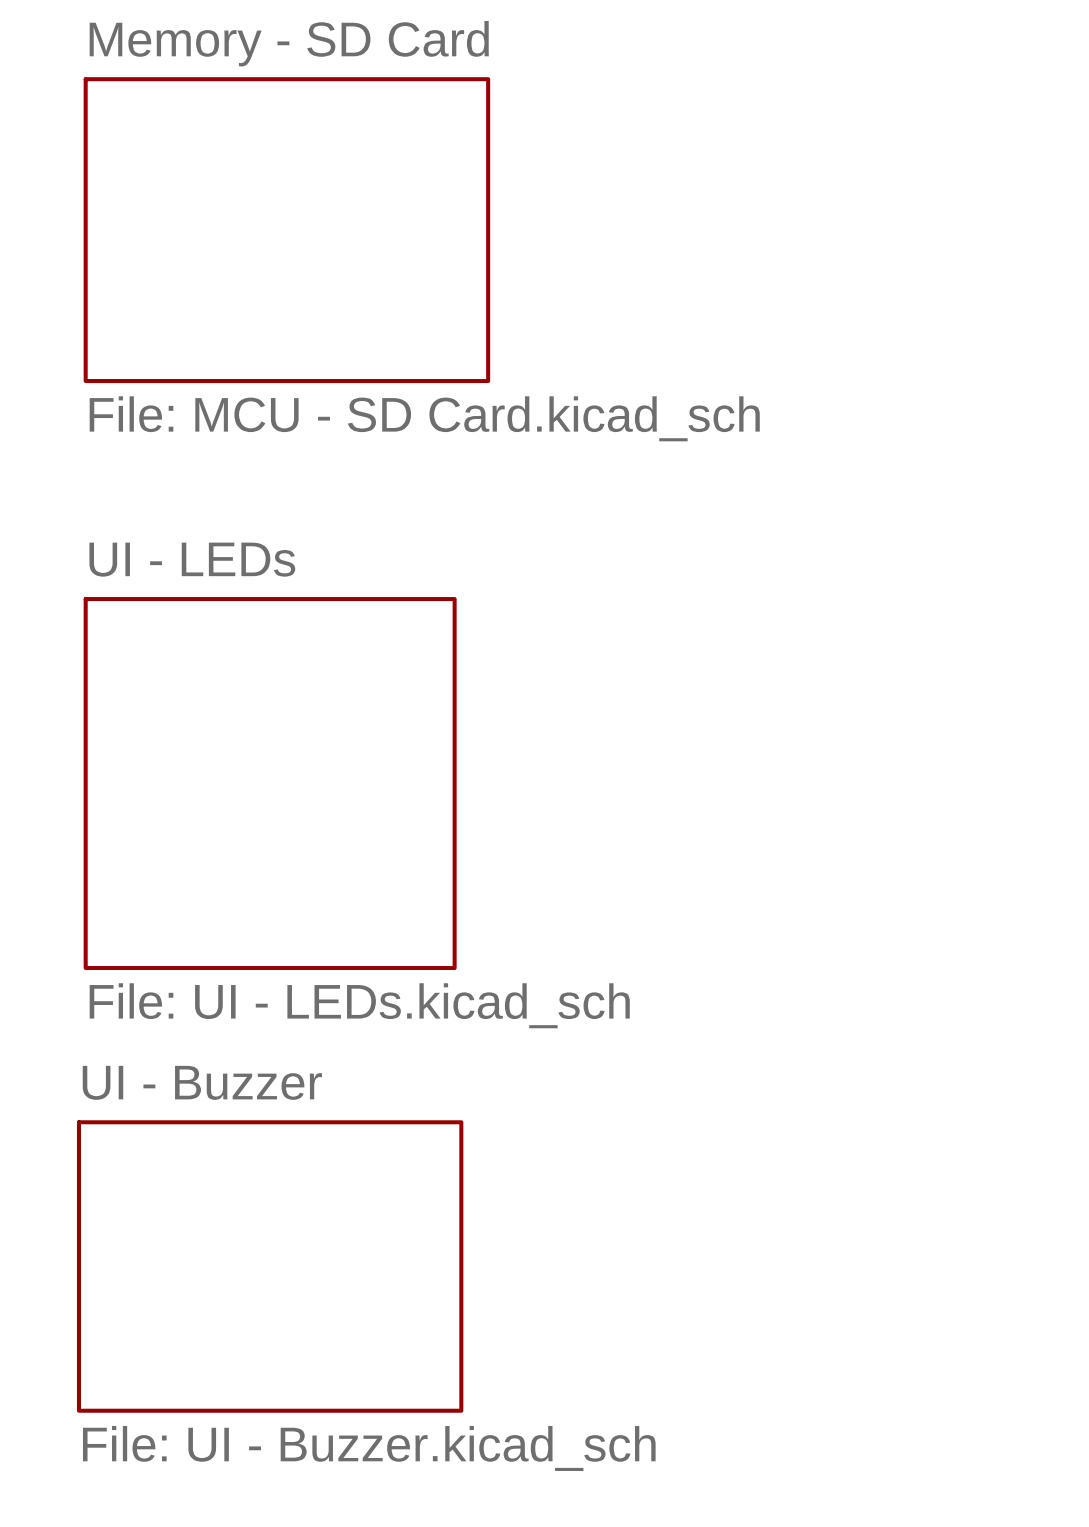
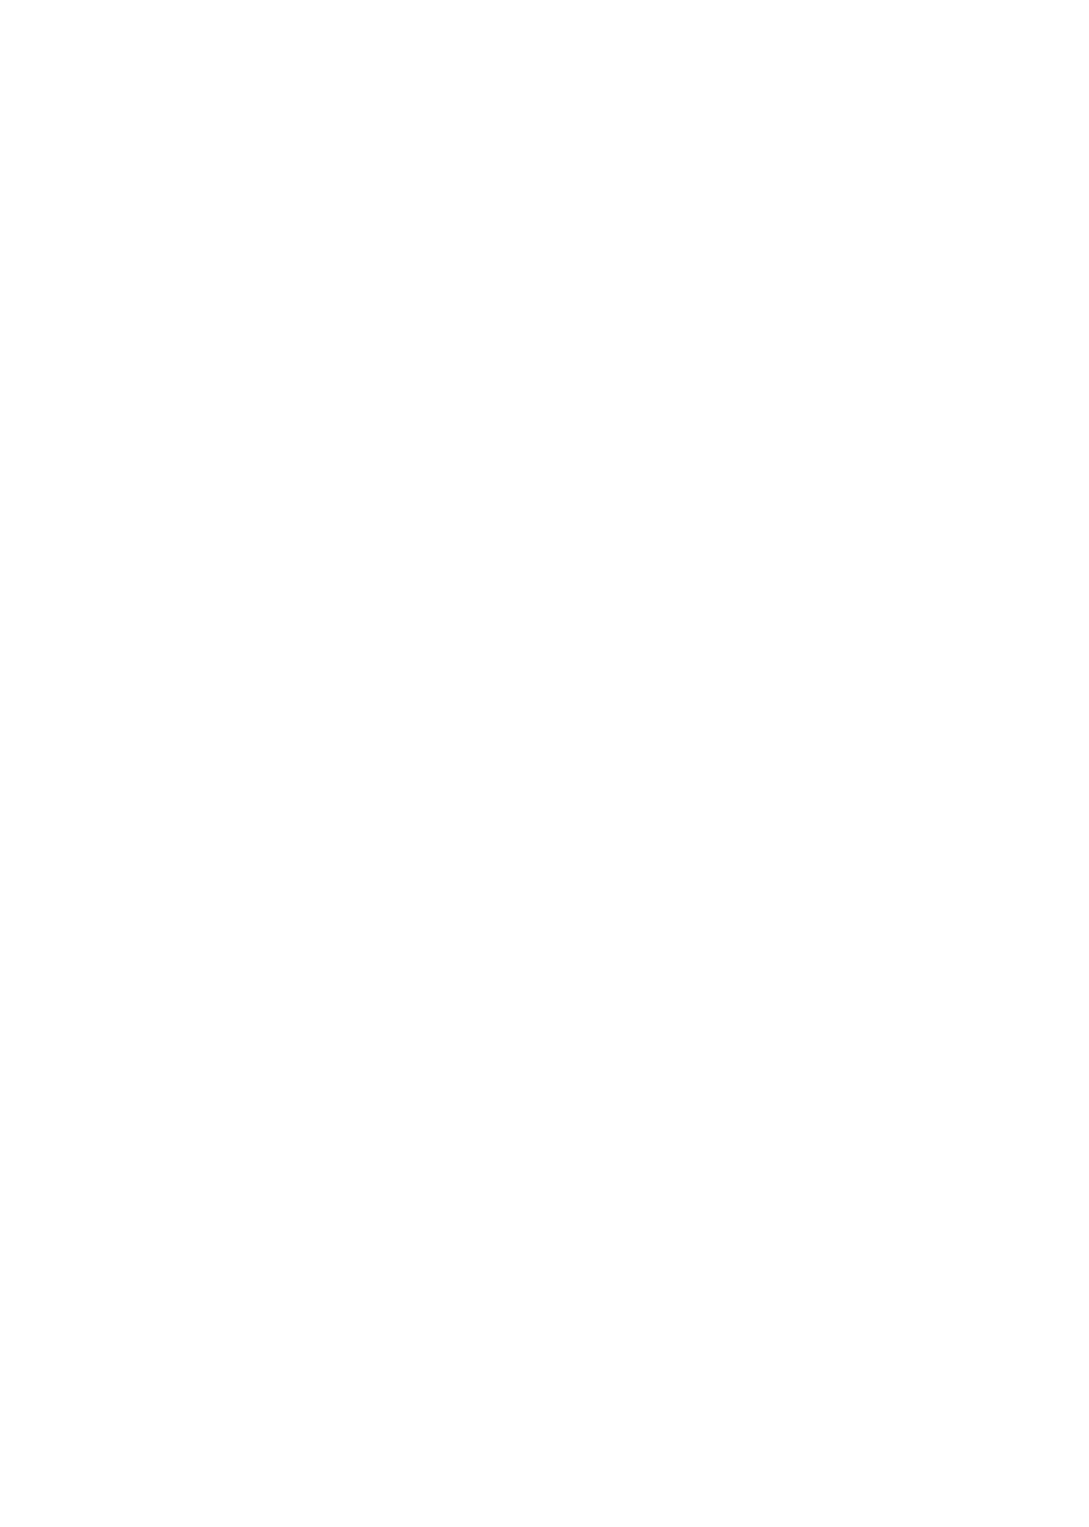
sheet Memory - SD Card: File: MCU - SD Card.kicad_sch (286, 230) -> none
sheet UI - LEDs: File: UI - LEDs.kicad_sch (270, 783) -> none
sheet UI - Buzzer: File: UI - Buzzer.kicad_sch (270, 1266) -> none

